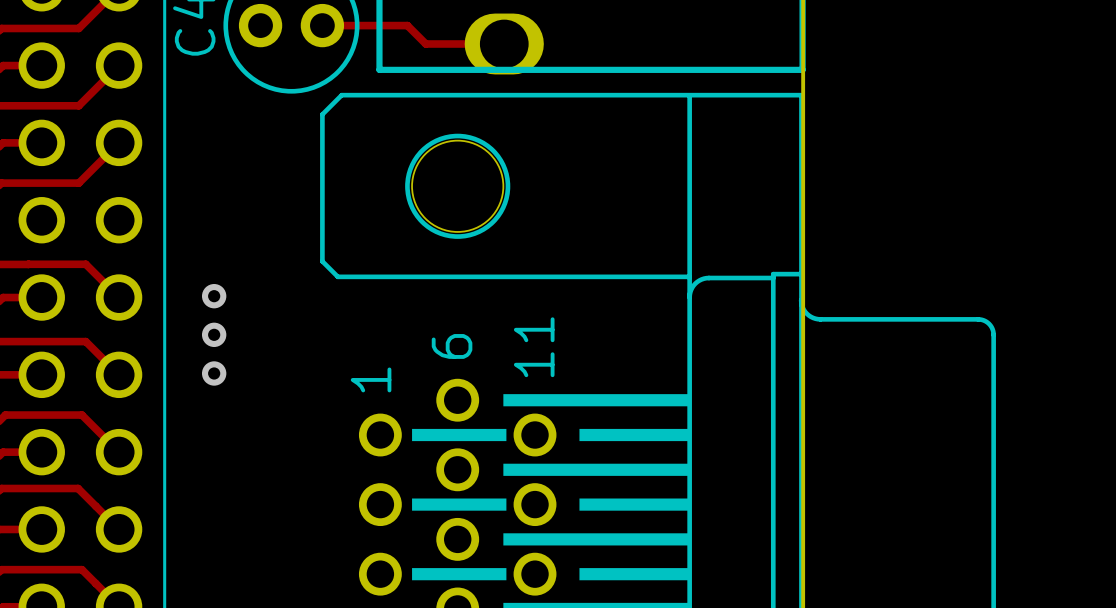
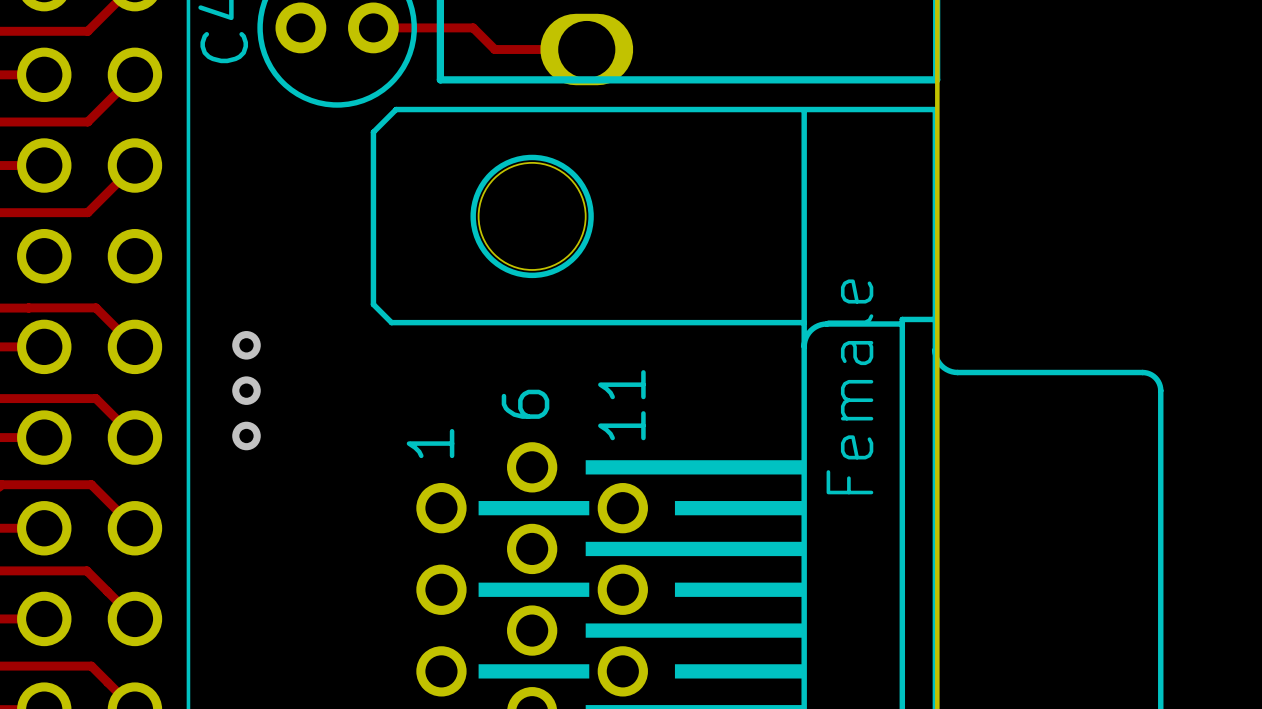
part text: none -> Female (849, 386)

